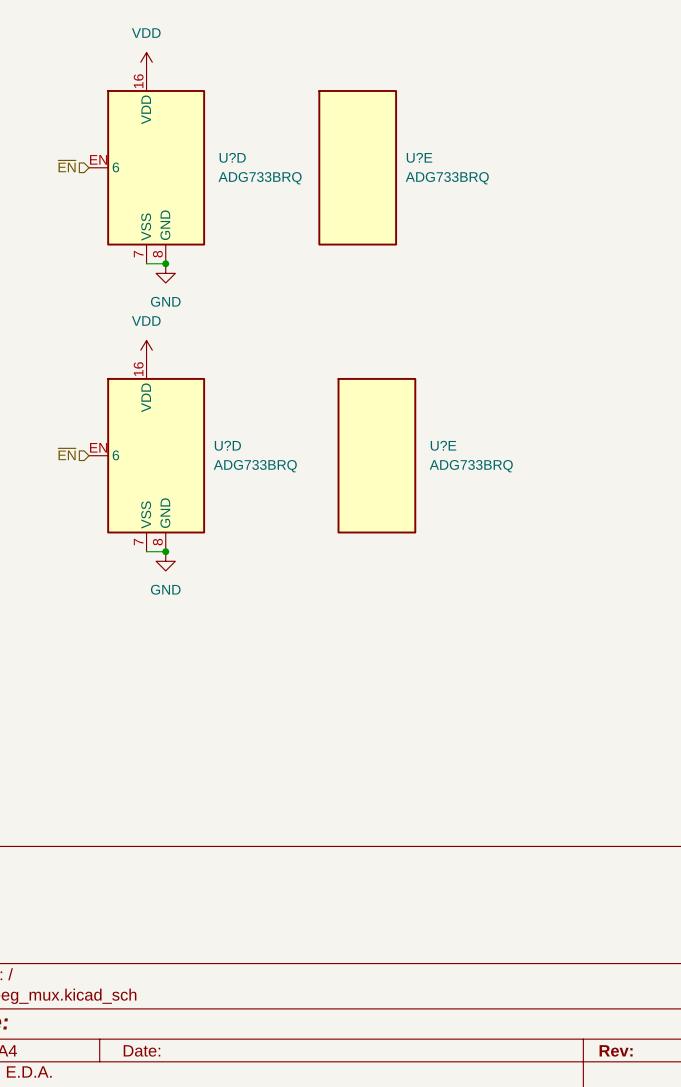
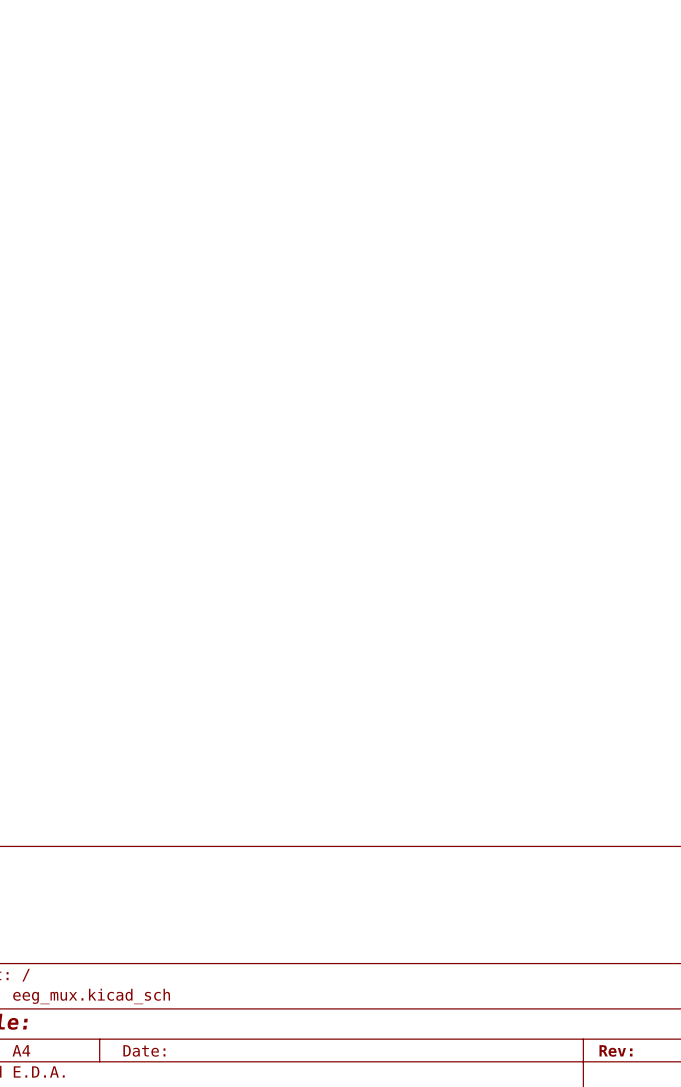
power symbol: VDD (146, 62) -> none
hierarchical label: ~{EN} (67, 166) -> none
U?D: ADG733BRQ (147, 167) -> none
U?E: ADG733BRQ (357, 167) -> none
wire: (146, 263) (165, 263) -> none
junction: (165, 263) -> none
power symbol: GND (165, 273) -> none
power symbol: VDD (146, 350) -> none
hierarchical label: ~{EN} (67, 454) -> none
U?D: ADG733BRQ (147, 455) -> none
U?E: ADG733BRQ (376, 455) -> none
wire: (146, 551) (165, 551) -> none
junction: (165, 551) -> none
power symbol: GND (165, 561) -> none

